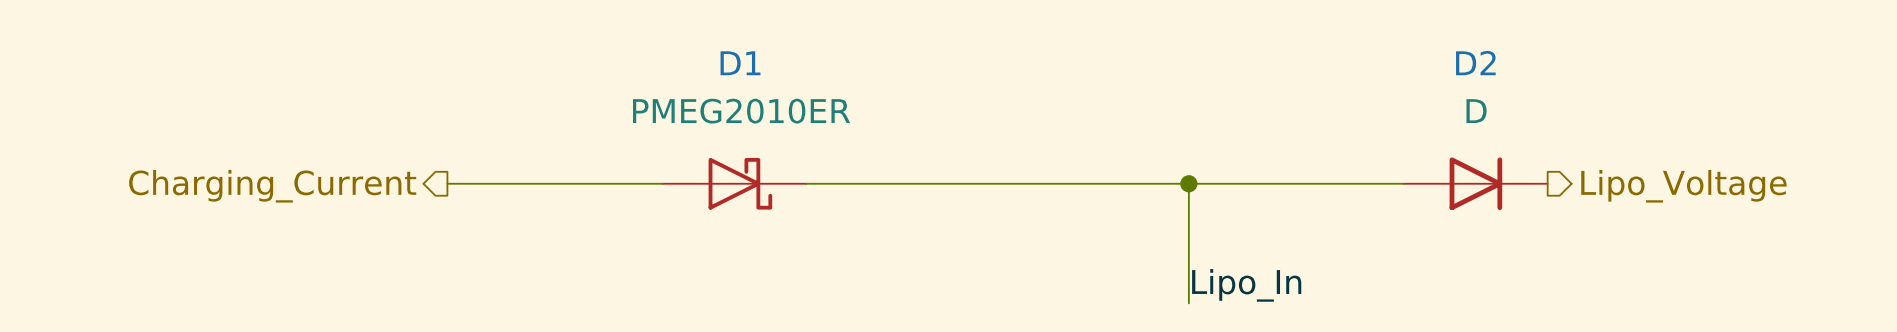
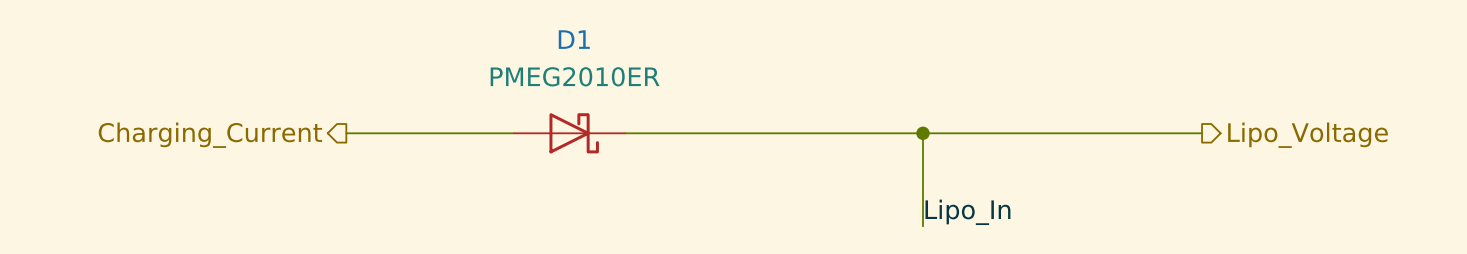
D2: D (1475, 183) -> none

